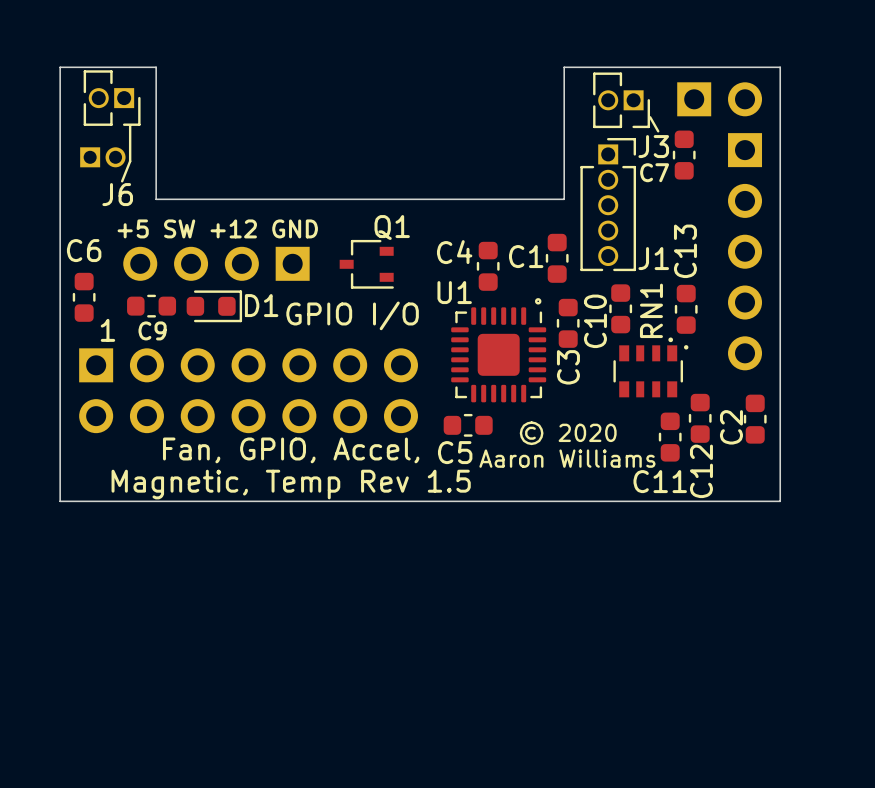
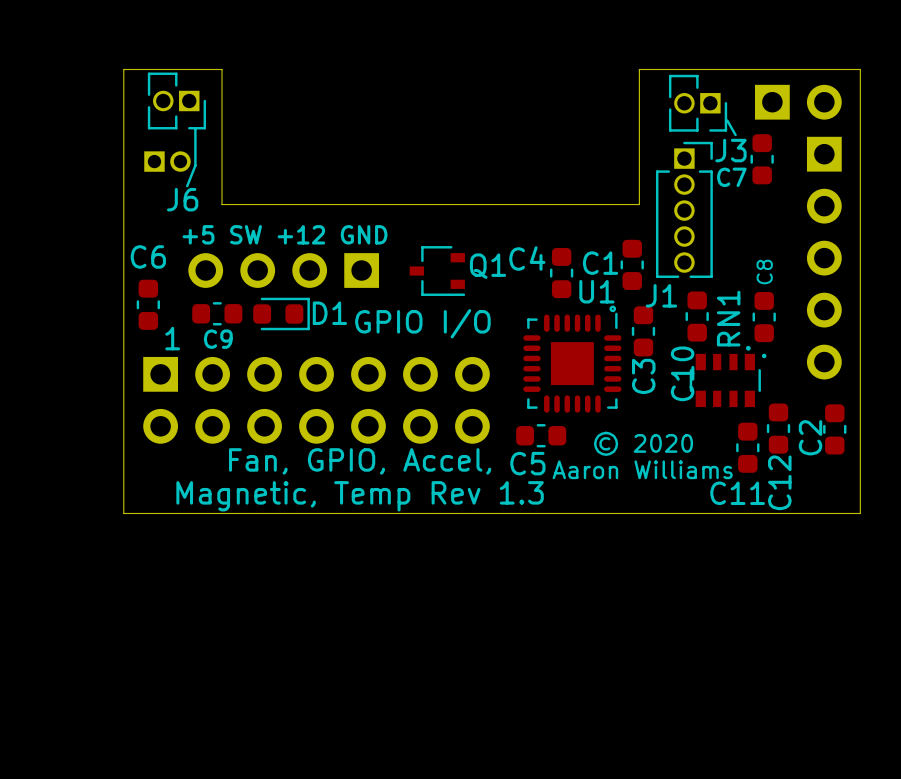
Q1 name position: Q1 (392, 227) -> Q1 (487, 266)
C13 name: C13 (685, 251) -> C8 (764, 272)
J1 name position: J1 (653, 258) -> J1 (661, 295)
U1 name position: U1 (454, 292) -> U1 (596, 291)
U1 footprint: [451, 307, 547, 403] -> [523, 312, 622, 413]
C10 name position: C10 (595, 321) -> C10 (682, 373)
text: Magnetic, Temp Rev 1.5 (291, 484) -> Magnetic, Temp Rev 1.3 (360, 496)

